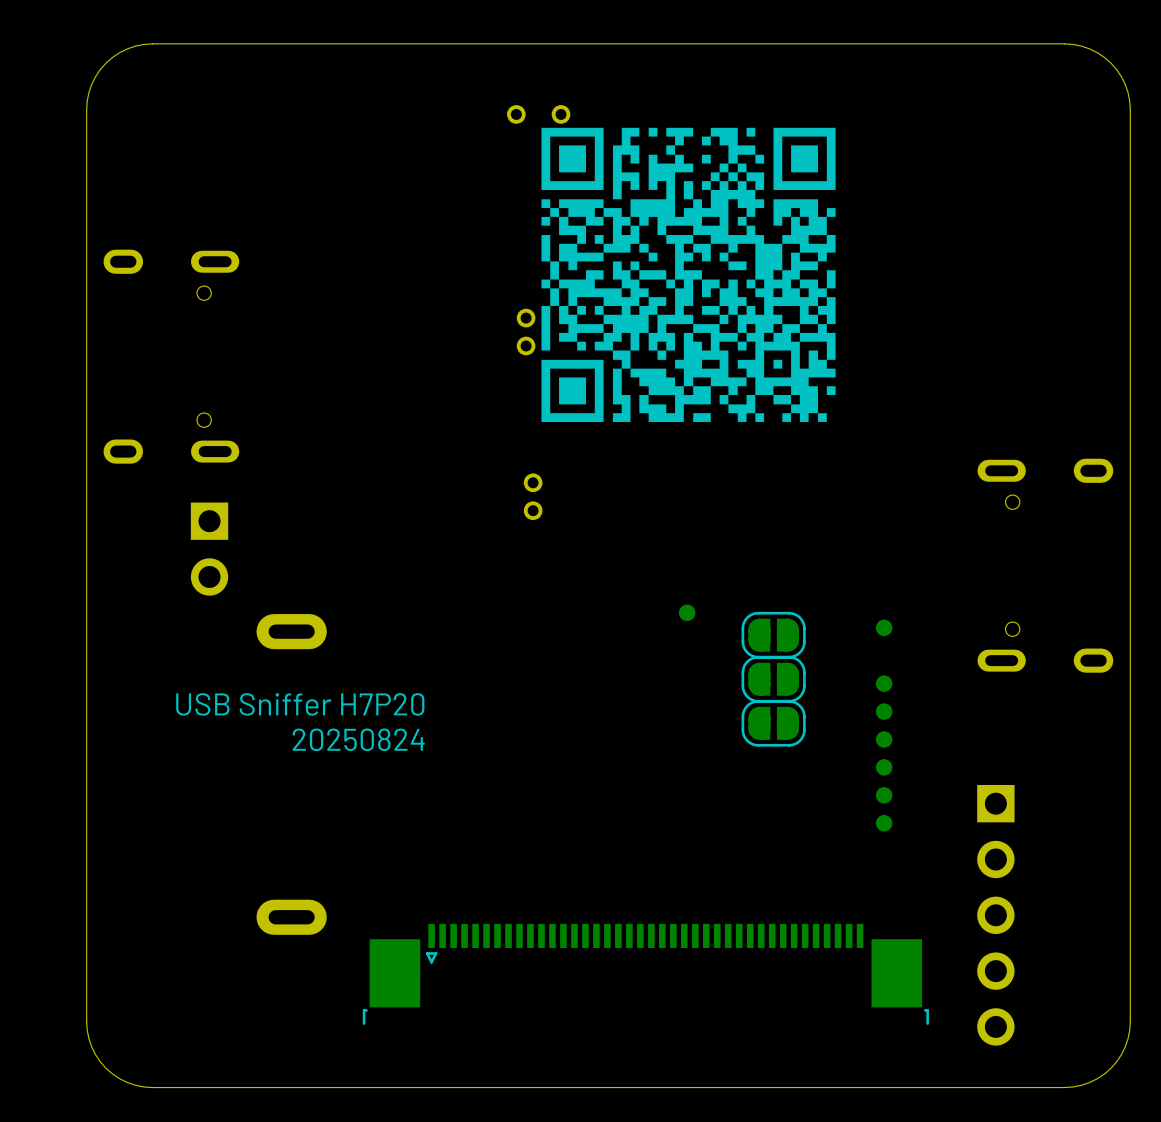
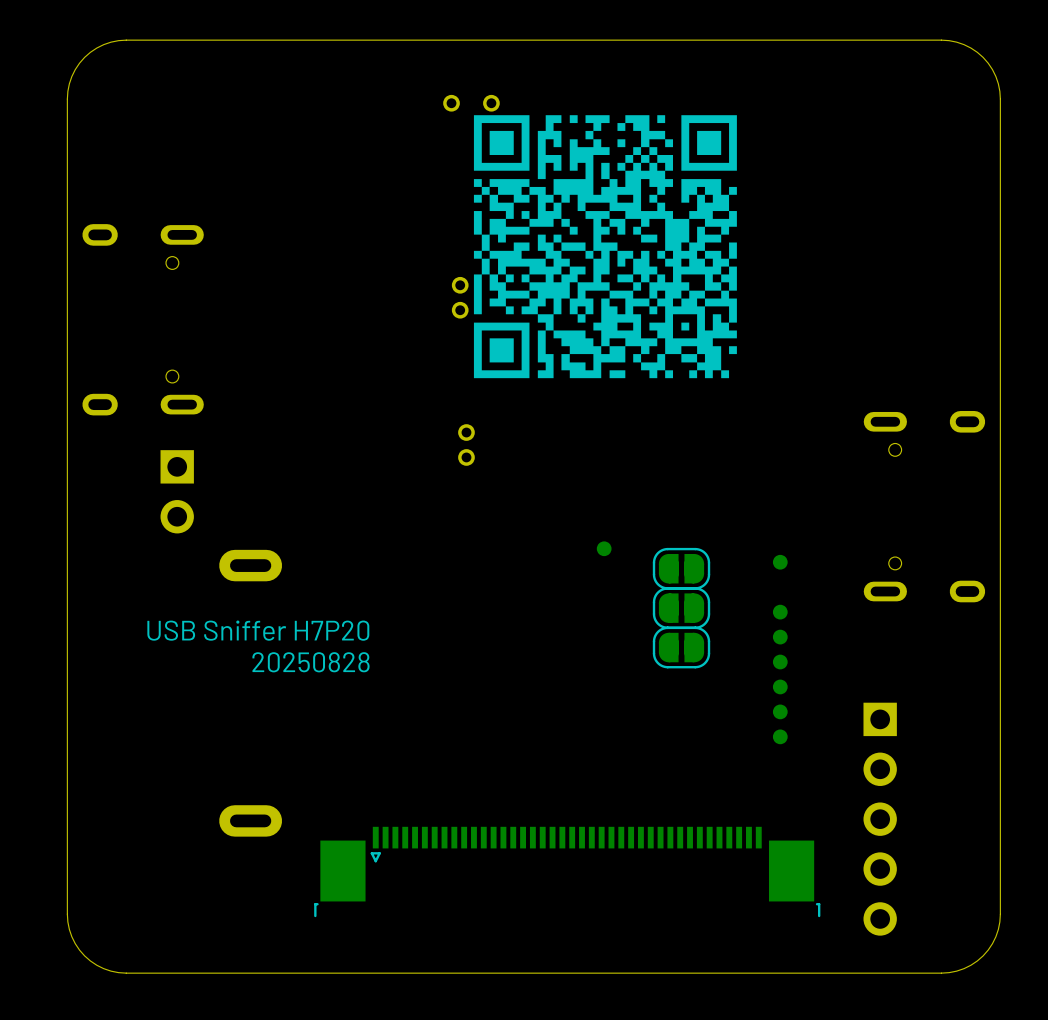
text: 20250824 (358, 739) -> 20250828 (310, 662)

